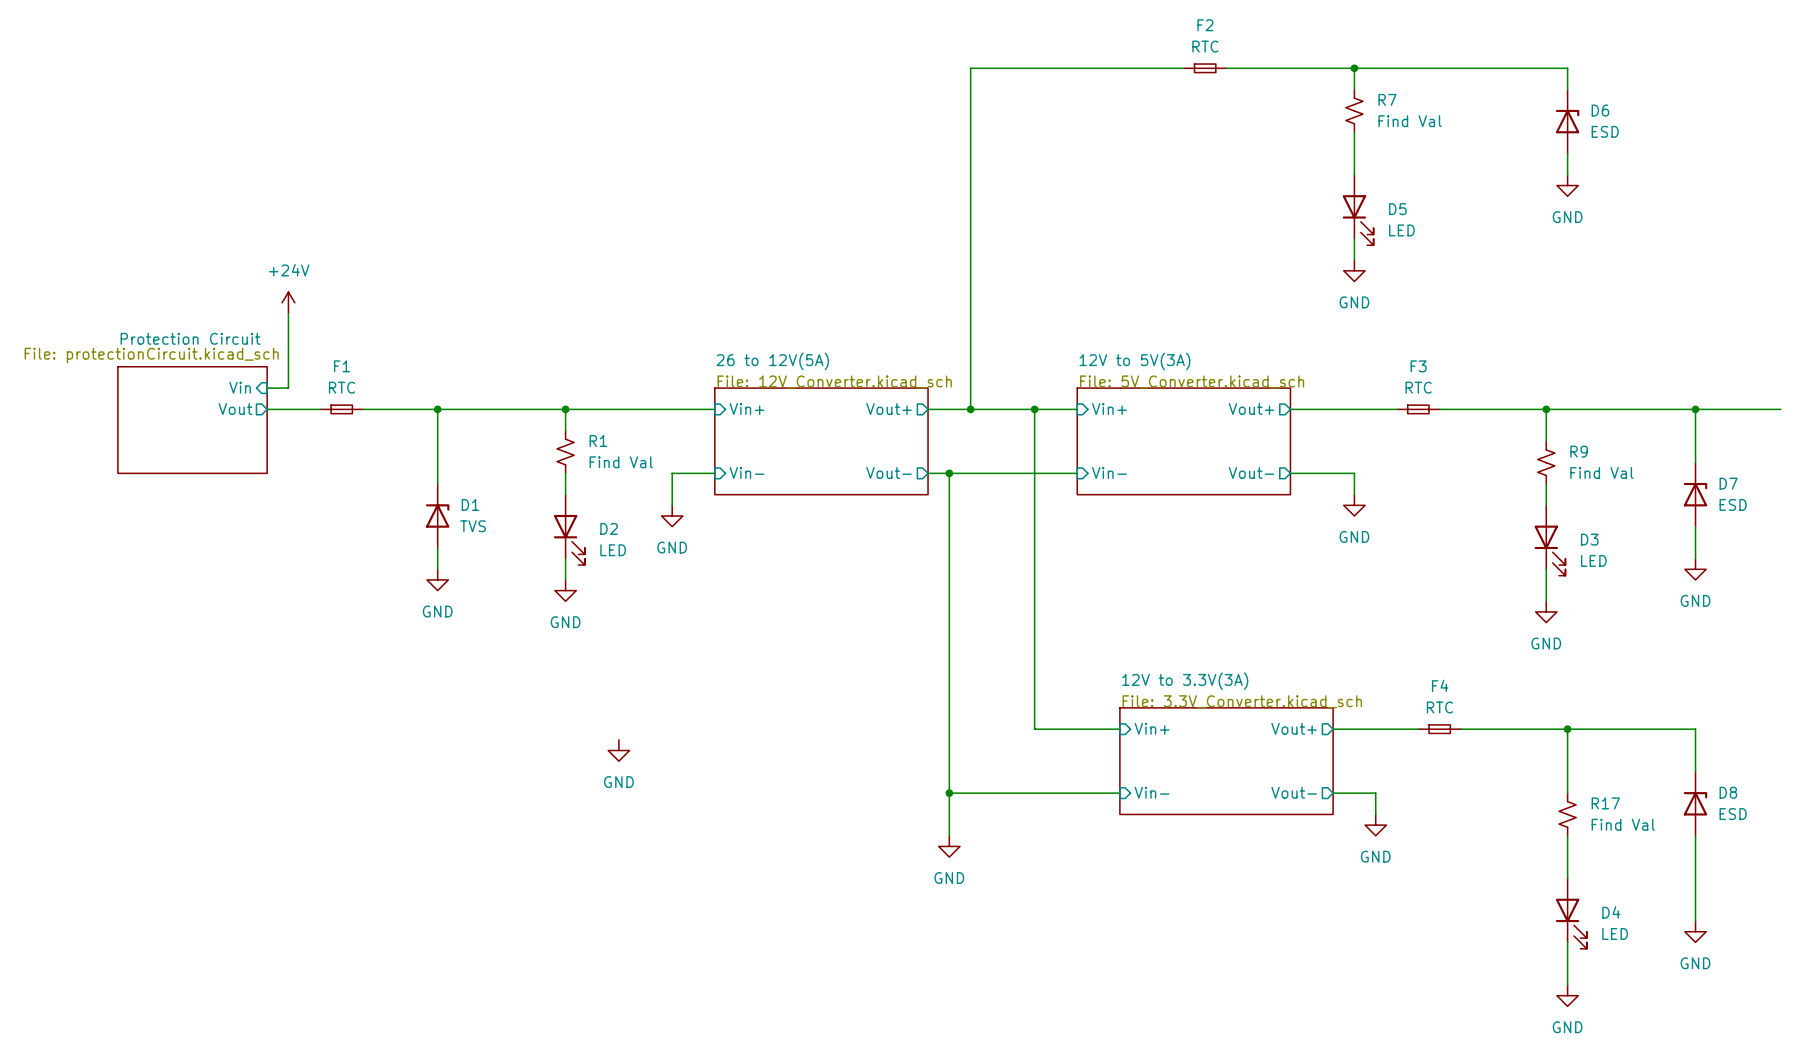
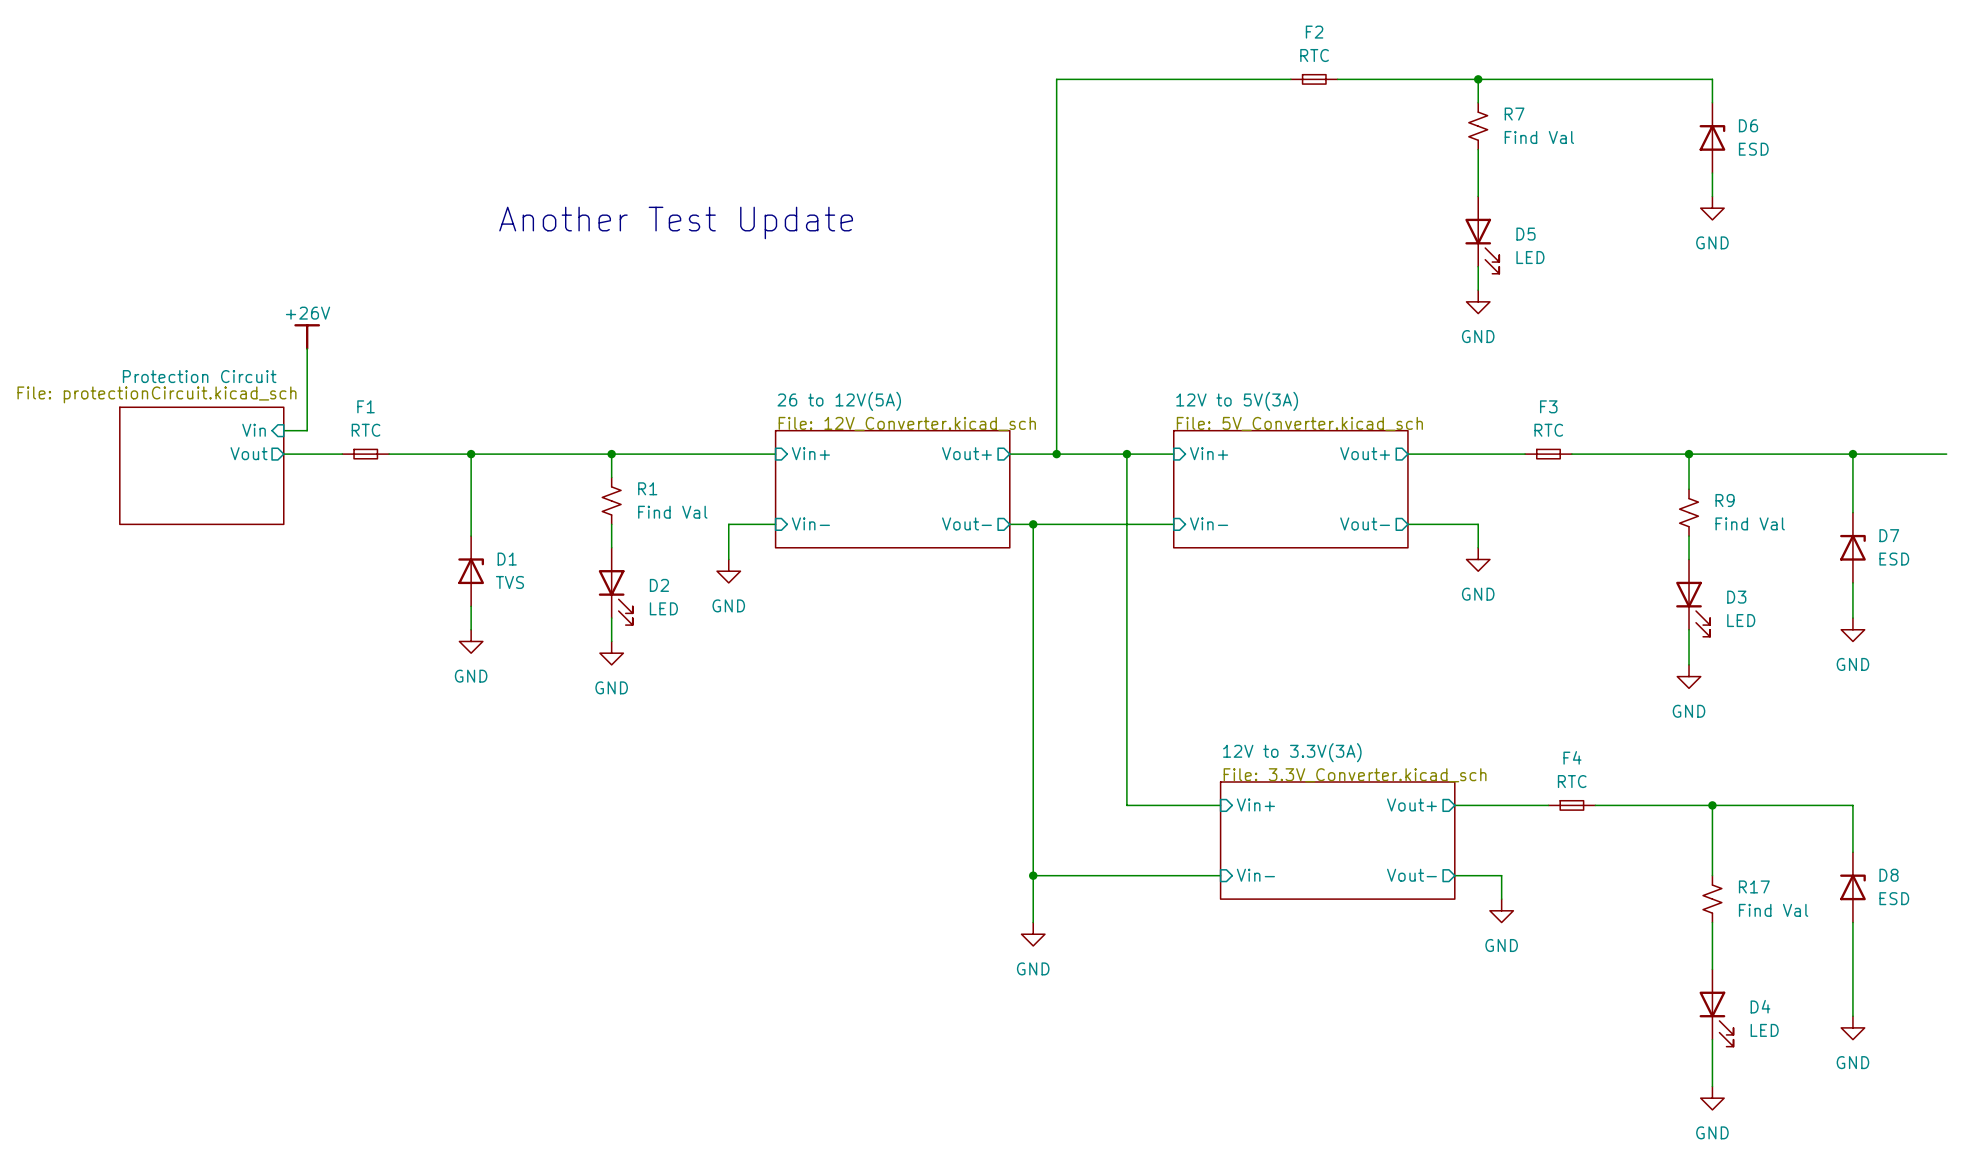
text: none -> Another Test Update (676, 222)
power symbol: +24V (288, 302) -> +26V (307, 337)
power symbol: GND (618, 750) -> none

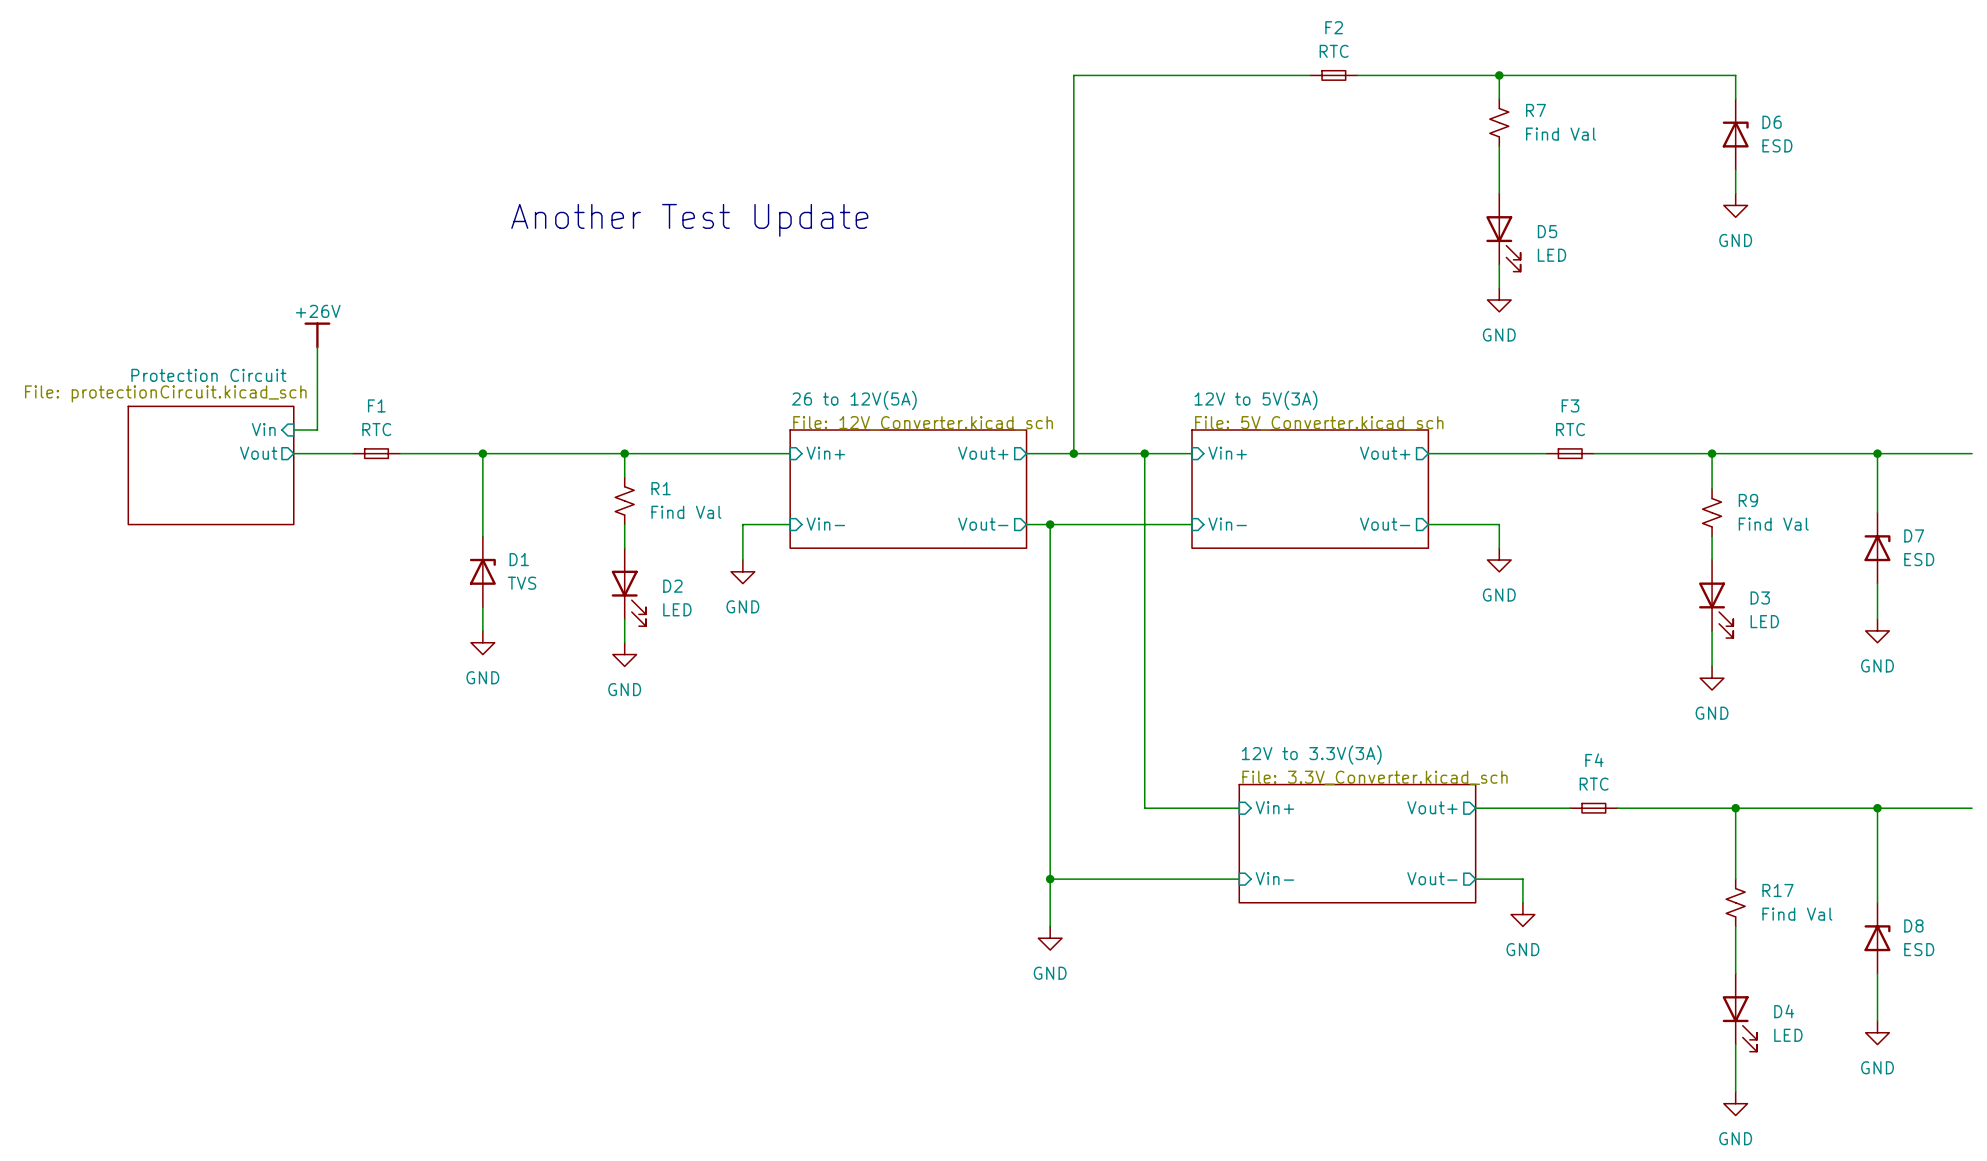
wire: none -> (1877, 808) (1972, 808)
junction: none -> (1877, 808)
D8 position: (1852, 887) -> (1877, 938)

